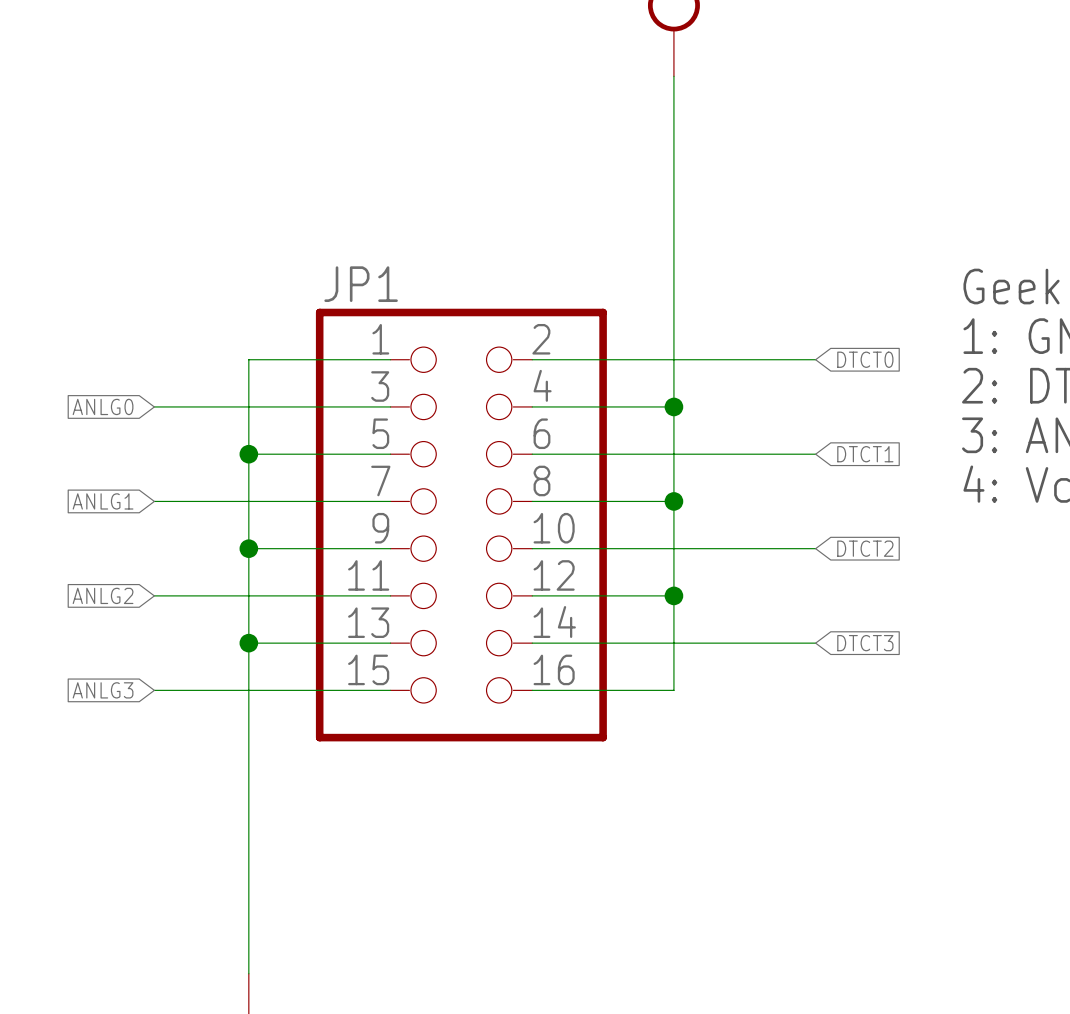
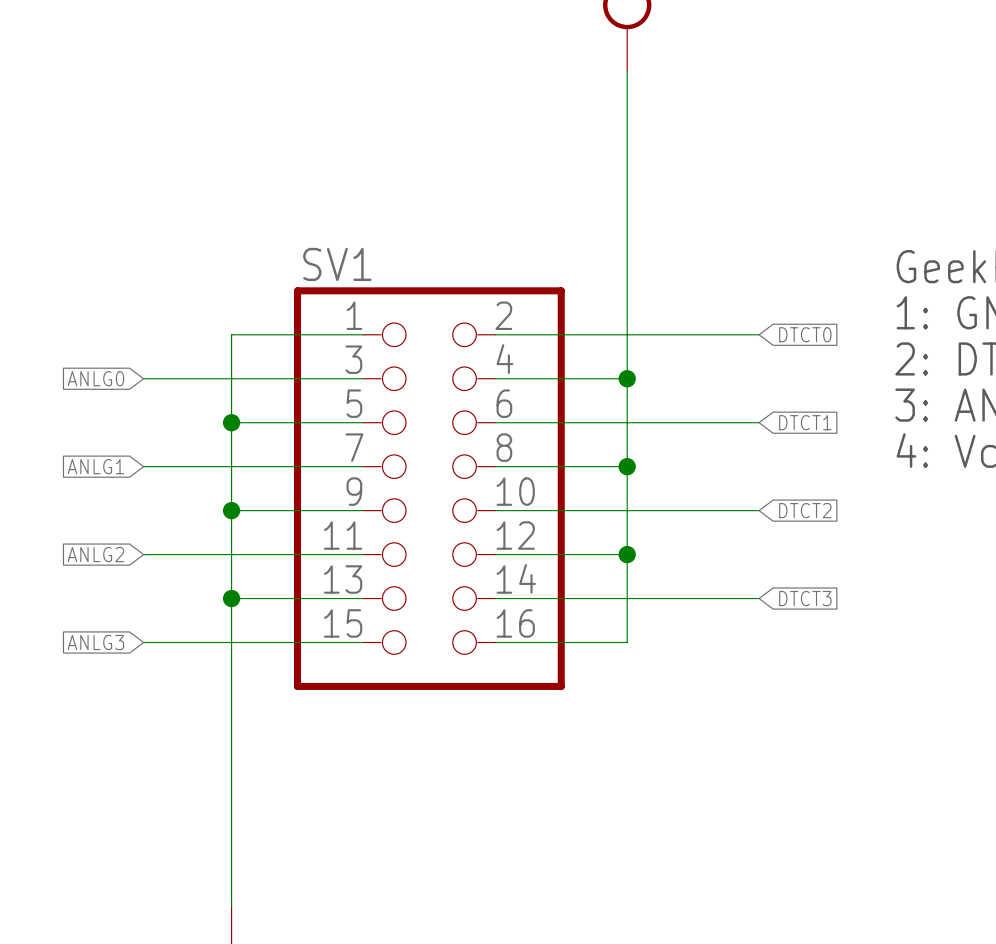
JP1 name: JP1 (361, 284) -> SV1 (337, 264)

